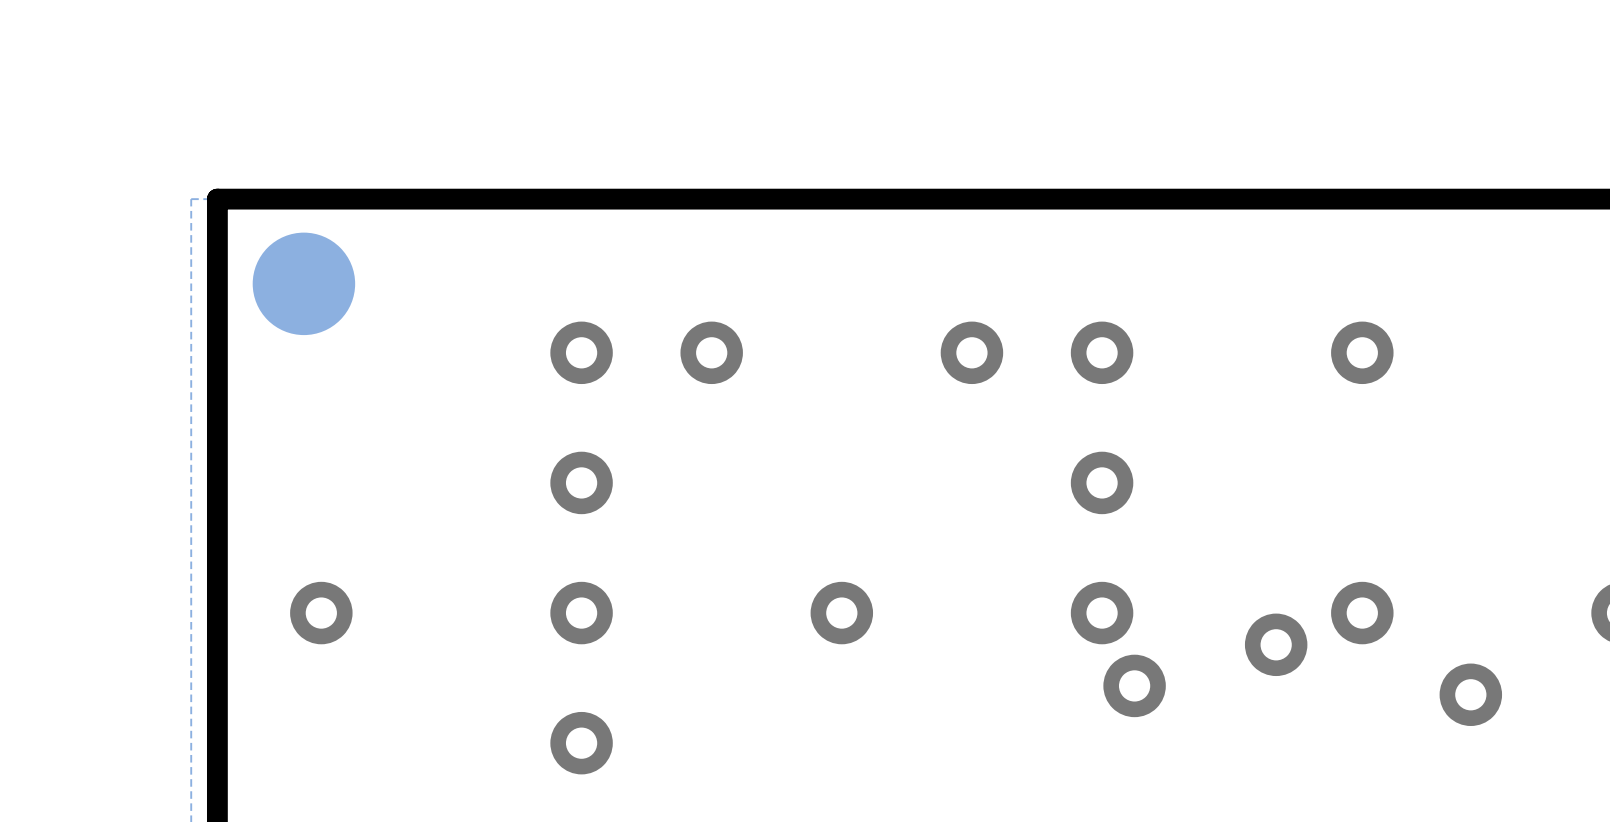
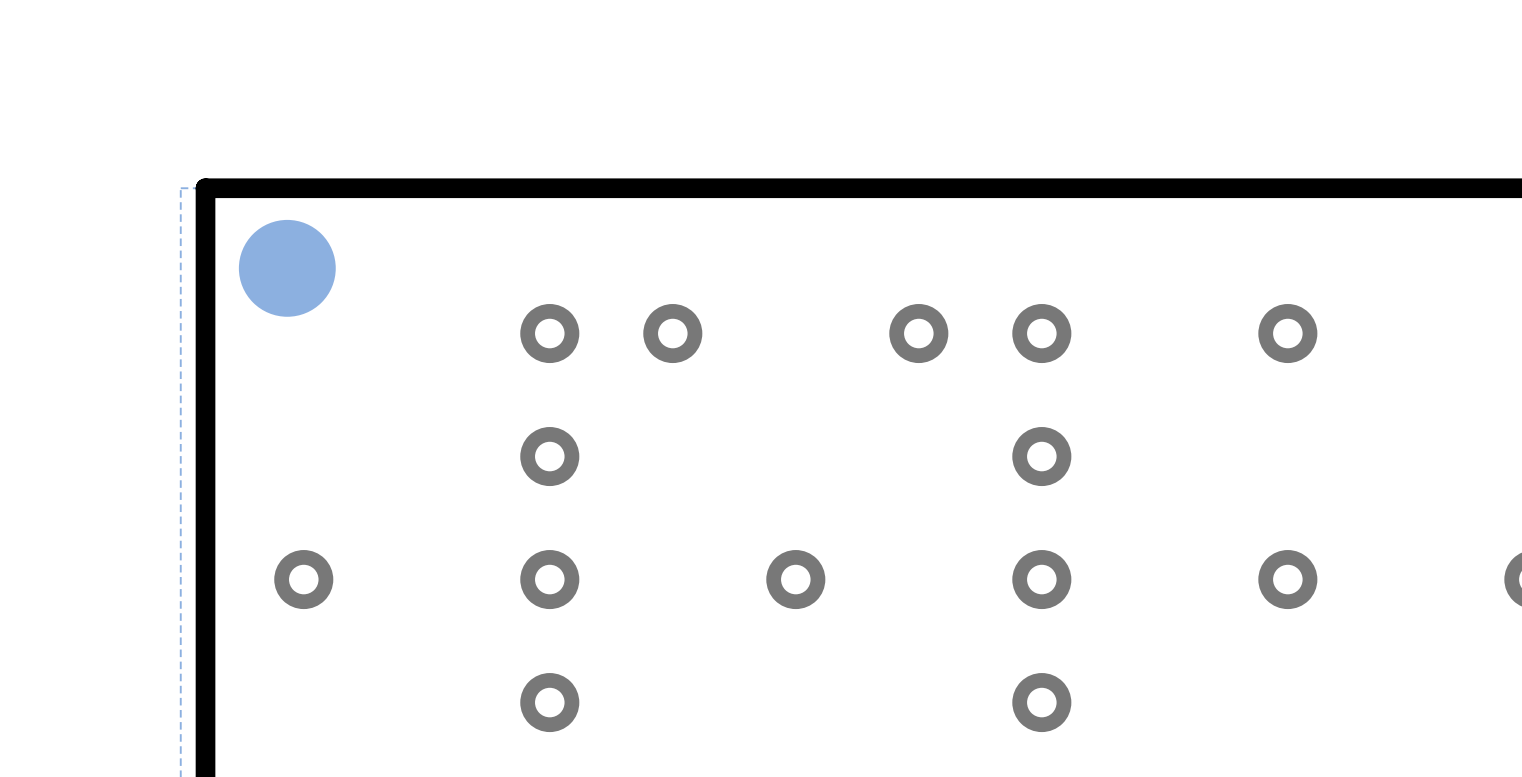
via: (1276, 644) -> none
via position: (1134, 685) -> (1041, 702)
via: (1470, 694) -> none

